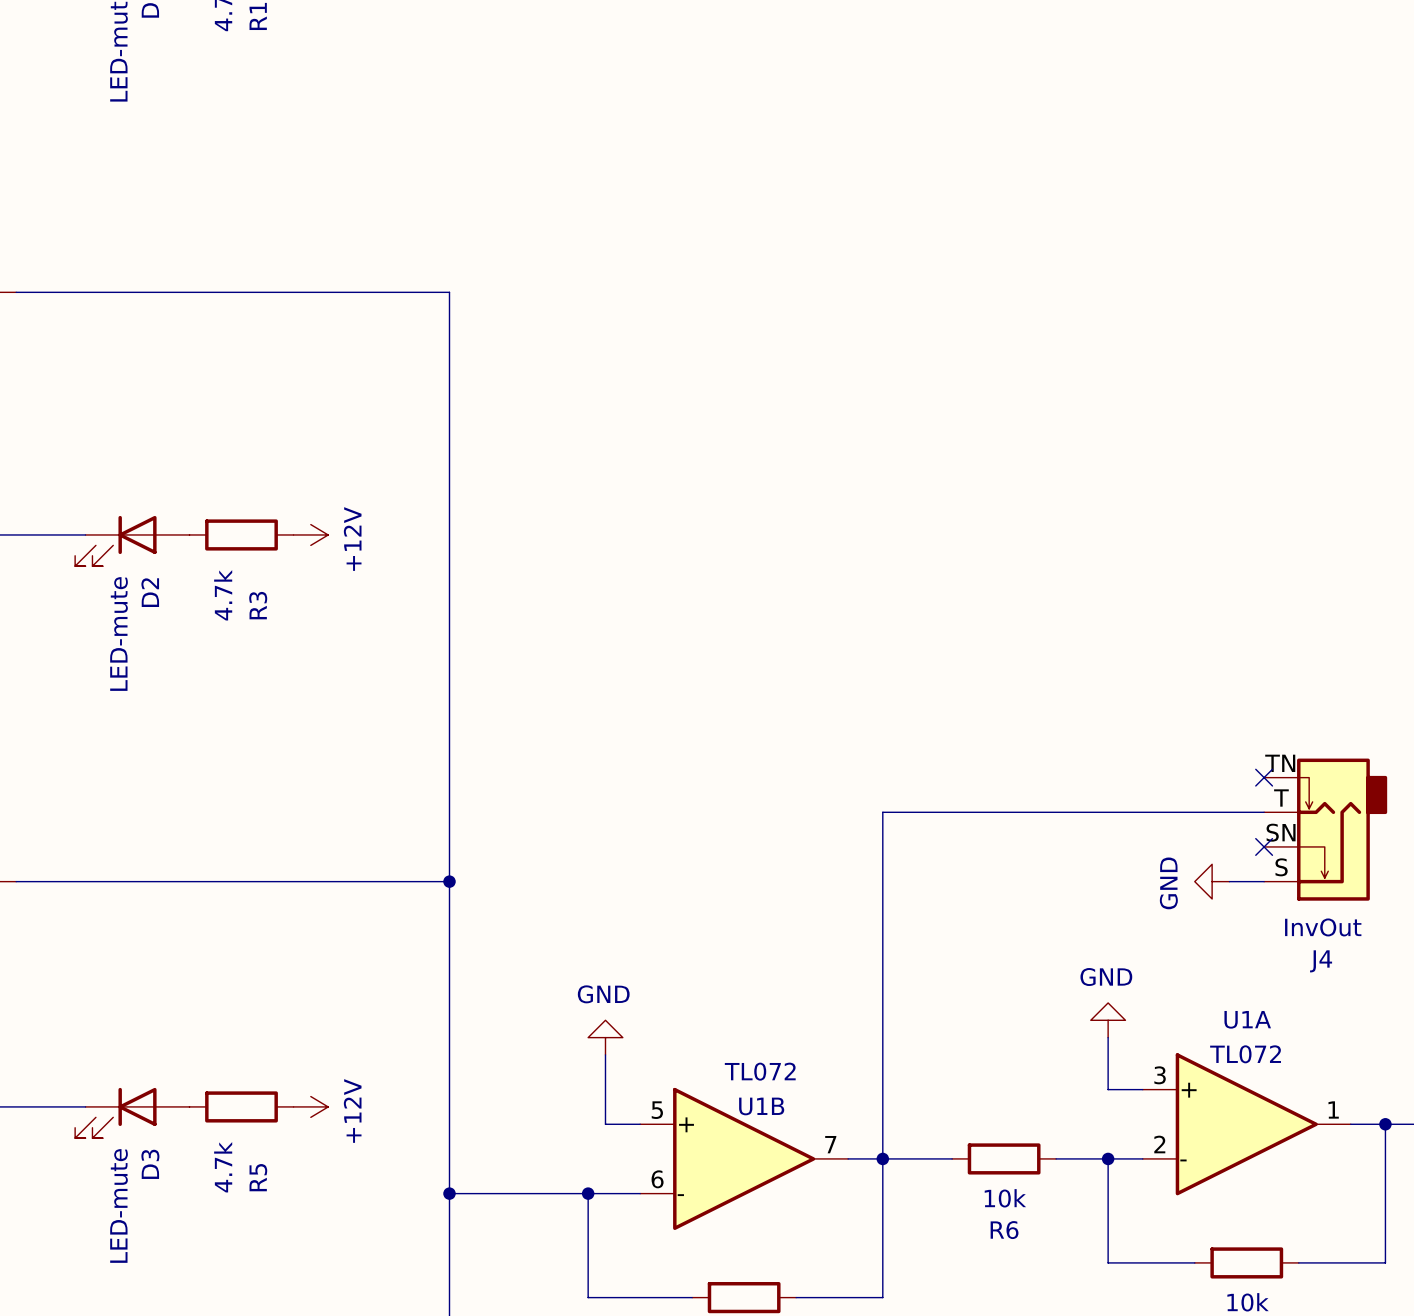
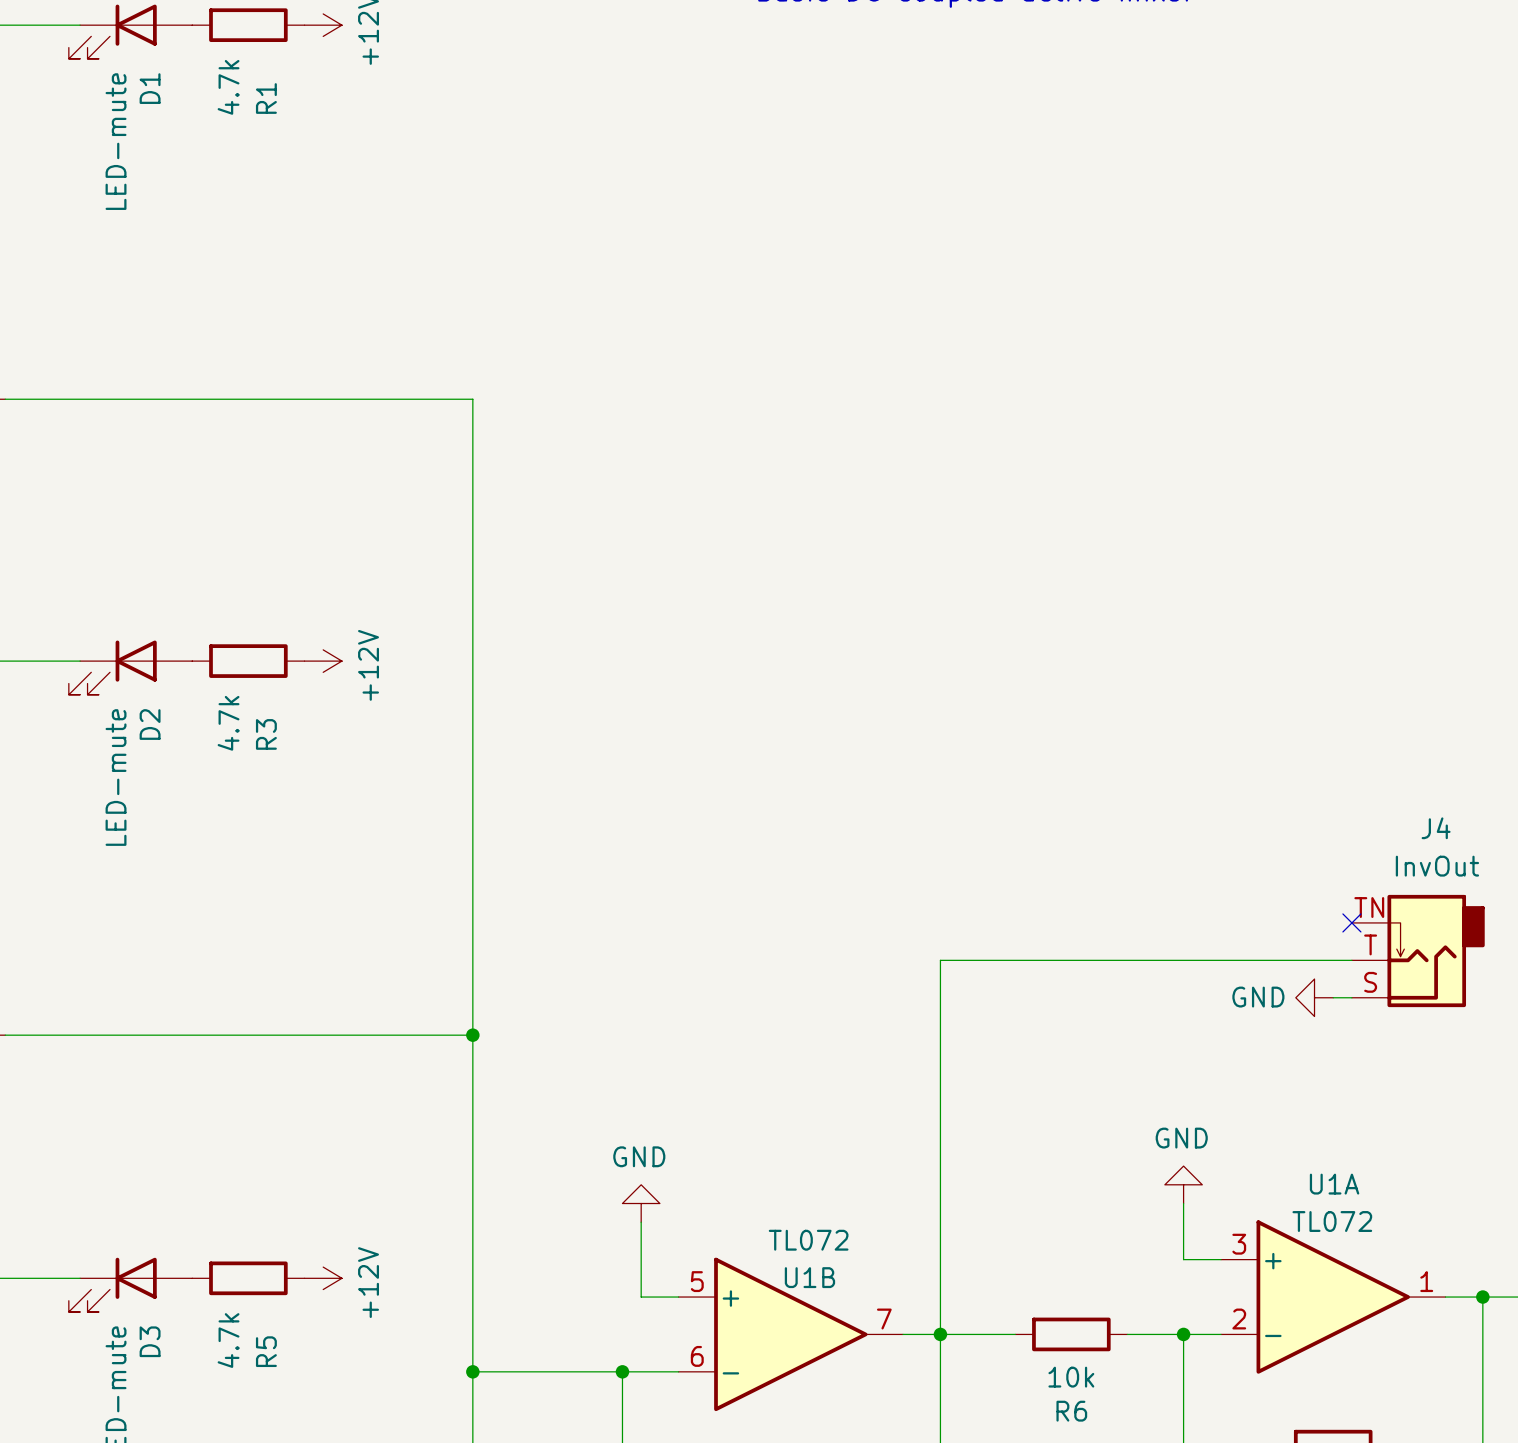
J4 symbol: [1264, 758, 1388, 901] -> [1351, 894, 1485, 1008]
wire: none -> (1333, 997) (1351, 997)
no-connect mark: (1264, 846) -> none
power symbol position: GND (1212, 881) -> GND (1314, 997)
wire: (1229, 881) (1264, 881) -> none
power symbol text rotation: 0° (1168, 883) -> 90° clockwise (1258, 997)
J4 value position: InvOut (1323, 927) -> InvOut (1437, 866)
J4 name position: J4 (1321, 961) -> J4 (1436, 828)

